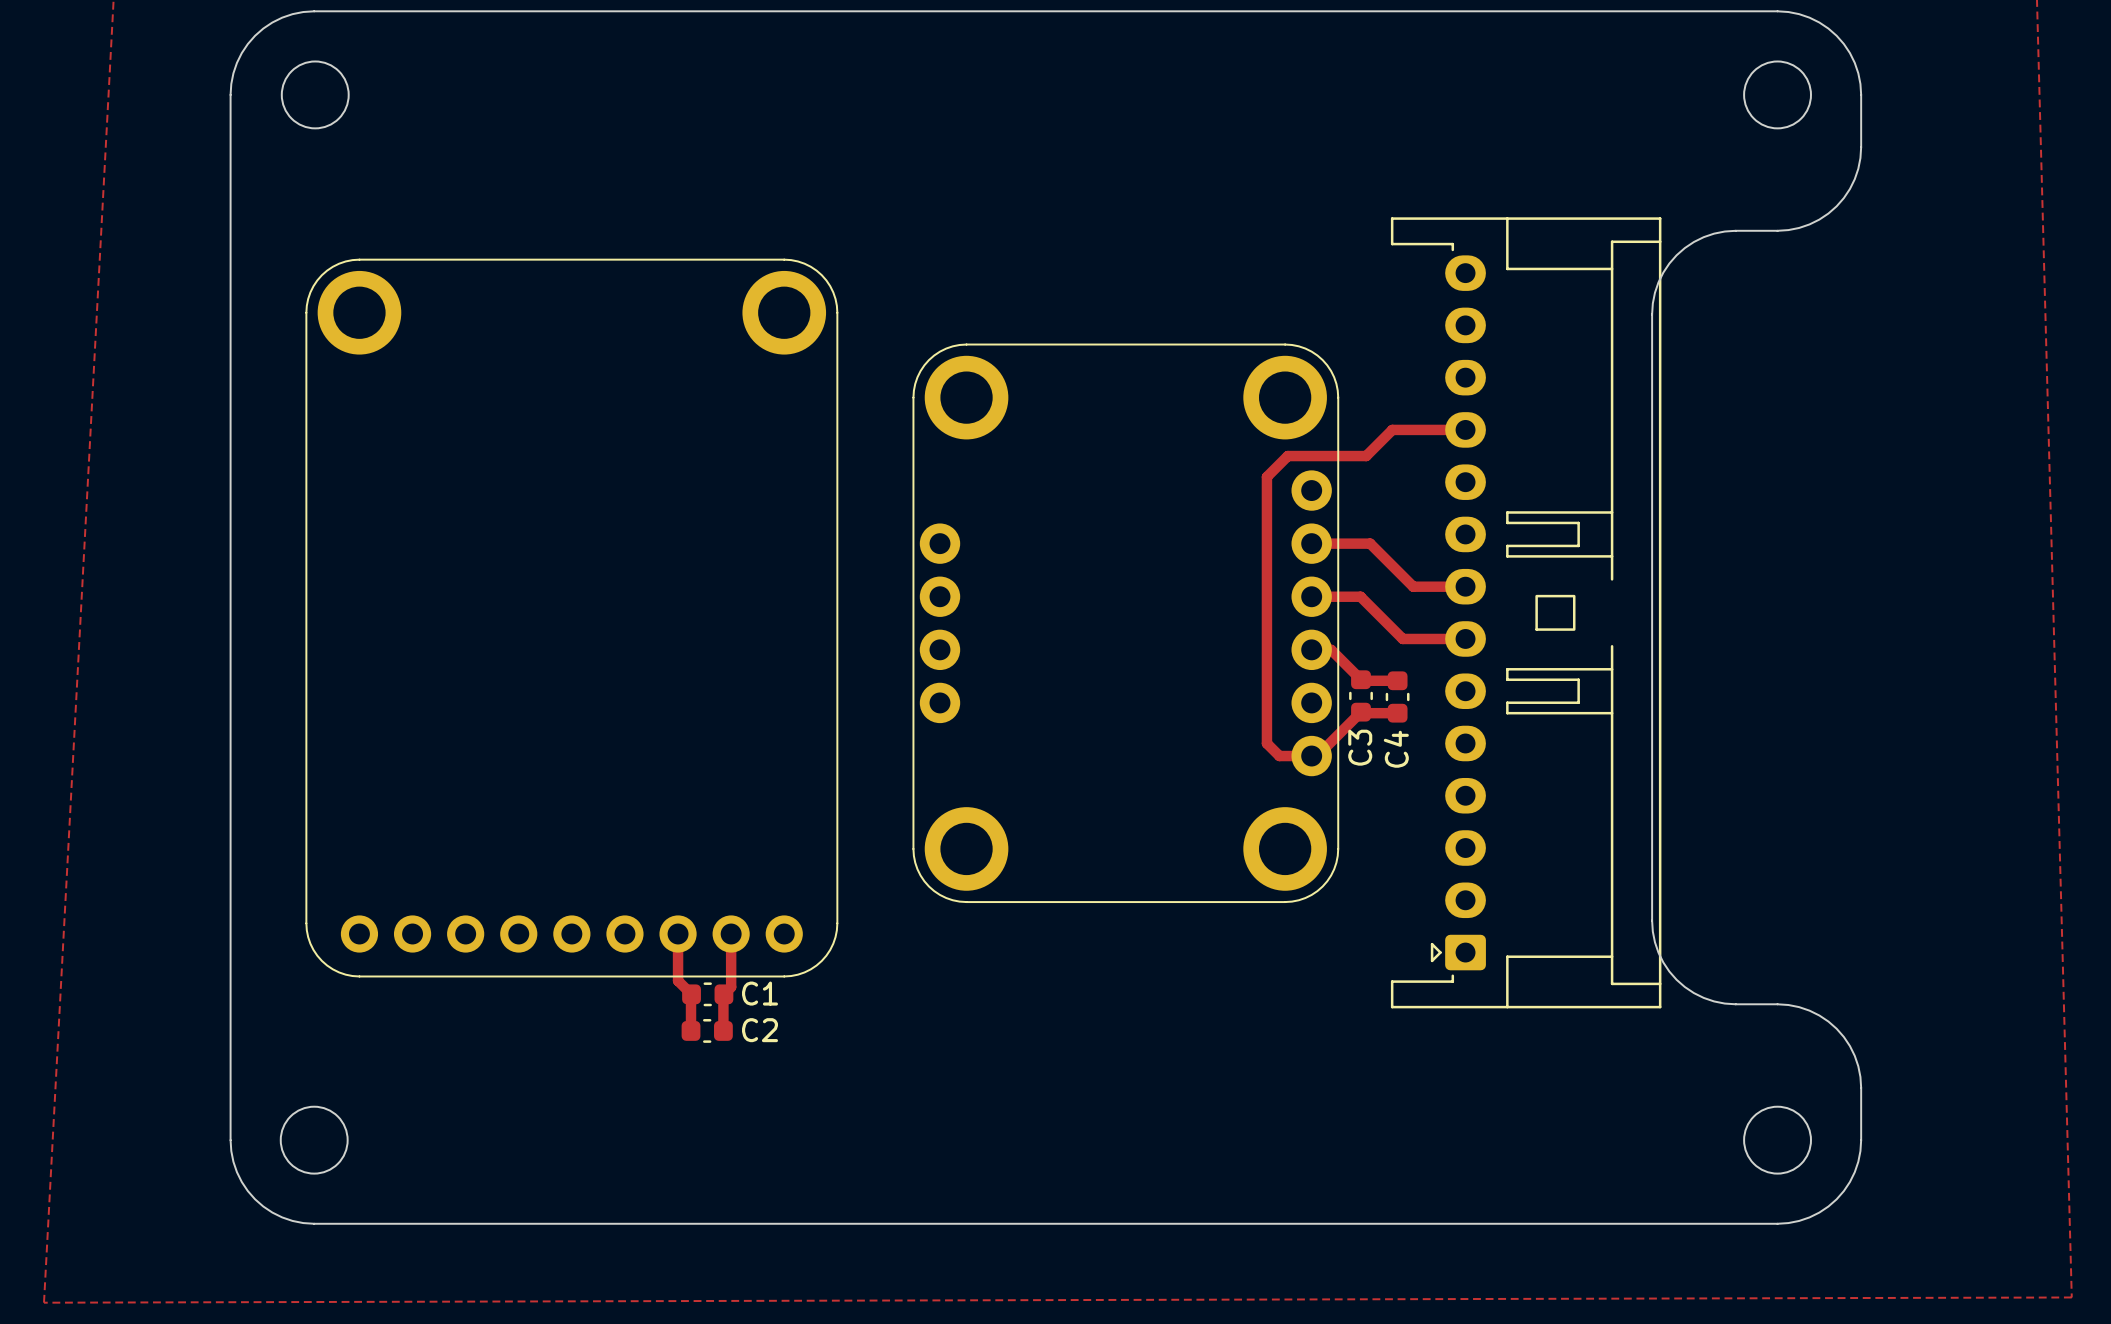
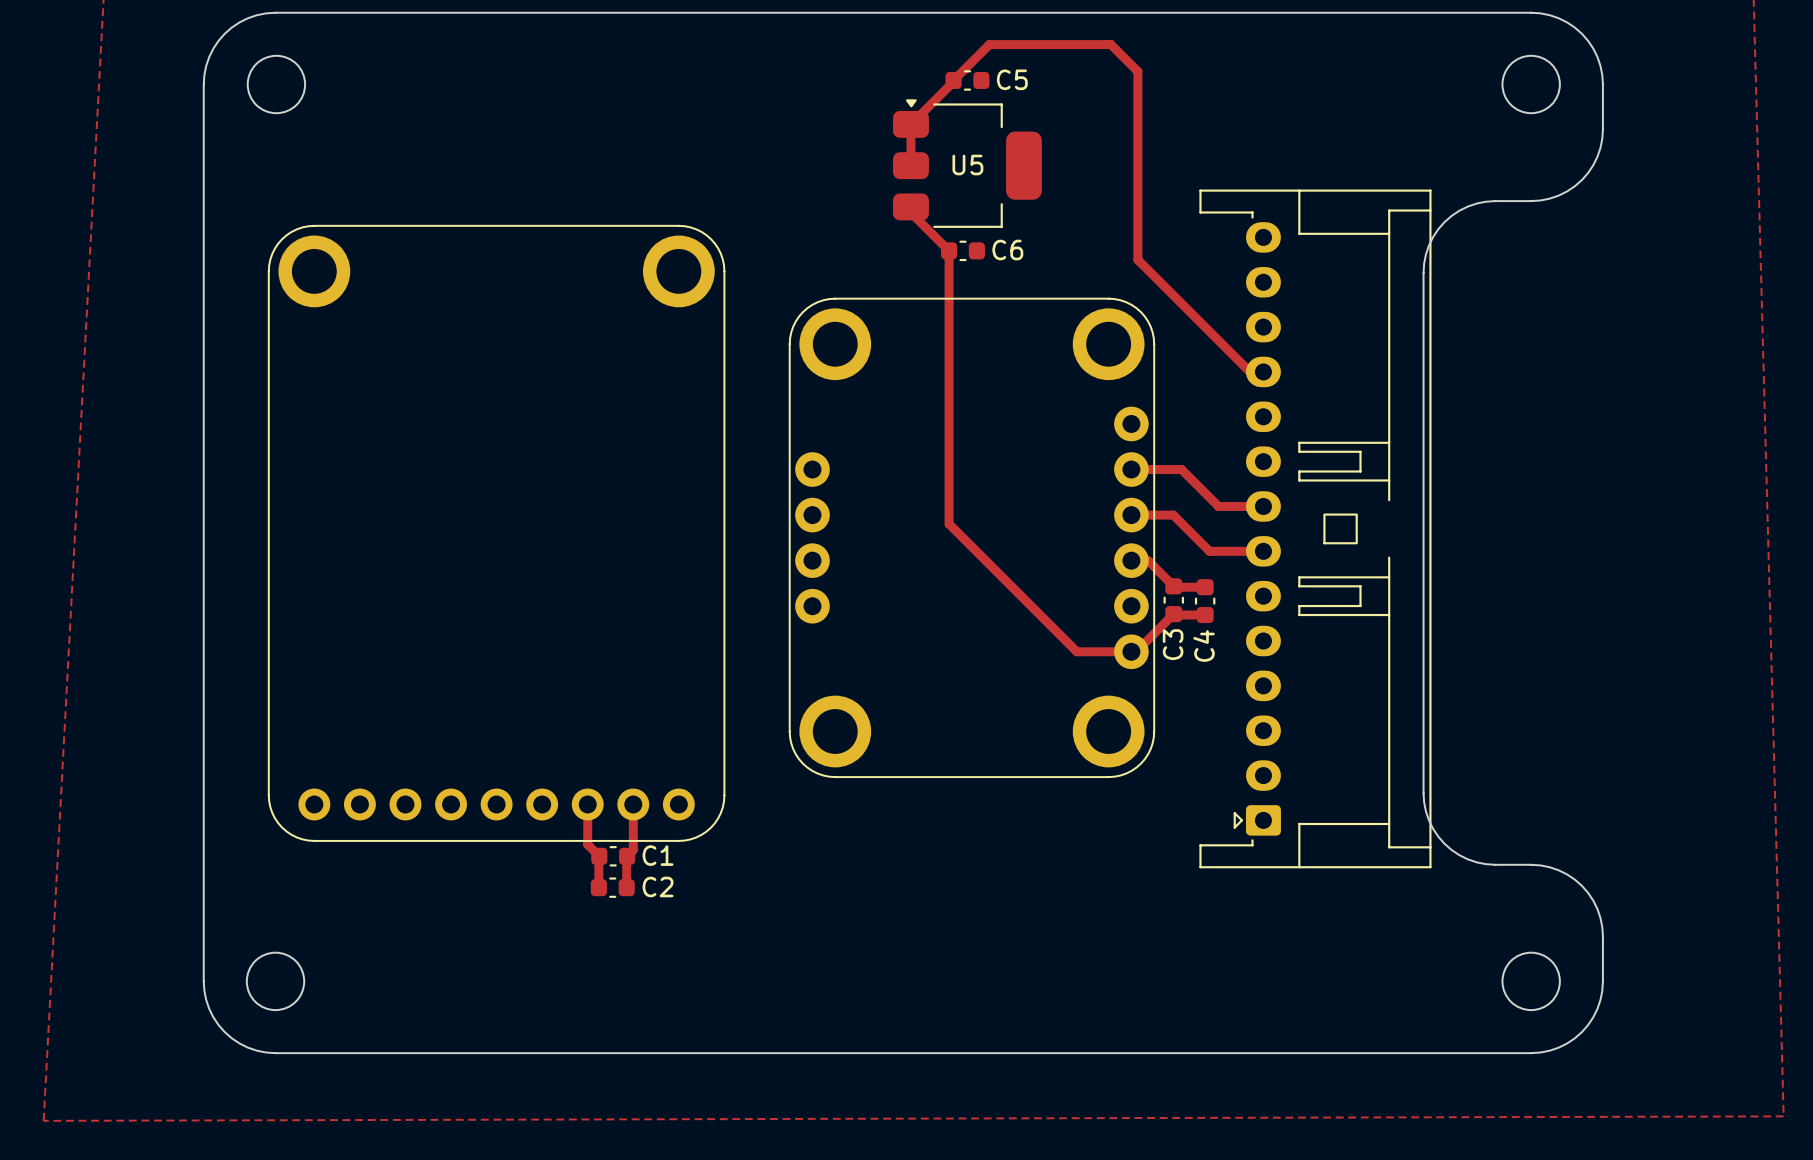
C5: none -> (967, 80)
U5: none -> (967, 163)
track: none -> (910, 165) (910, 124) (989, 44) (1110, 44) (1137, 71) (1137, 259) (1249, 371)
C6: none -> (962, 250)
track: (1449, 429) (1392, 429) (1366, 456) (1287, 456) (1266, 476) (1266, 743) (1279, 756) -> (910, 206) (910, 212) (949, 250) (949, 523) (1076, 651) (1103, 651)

